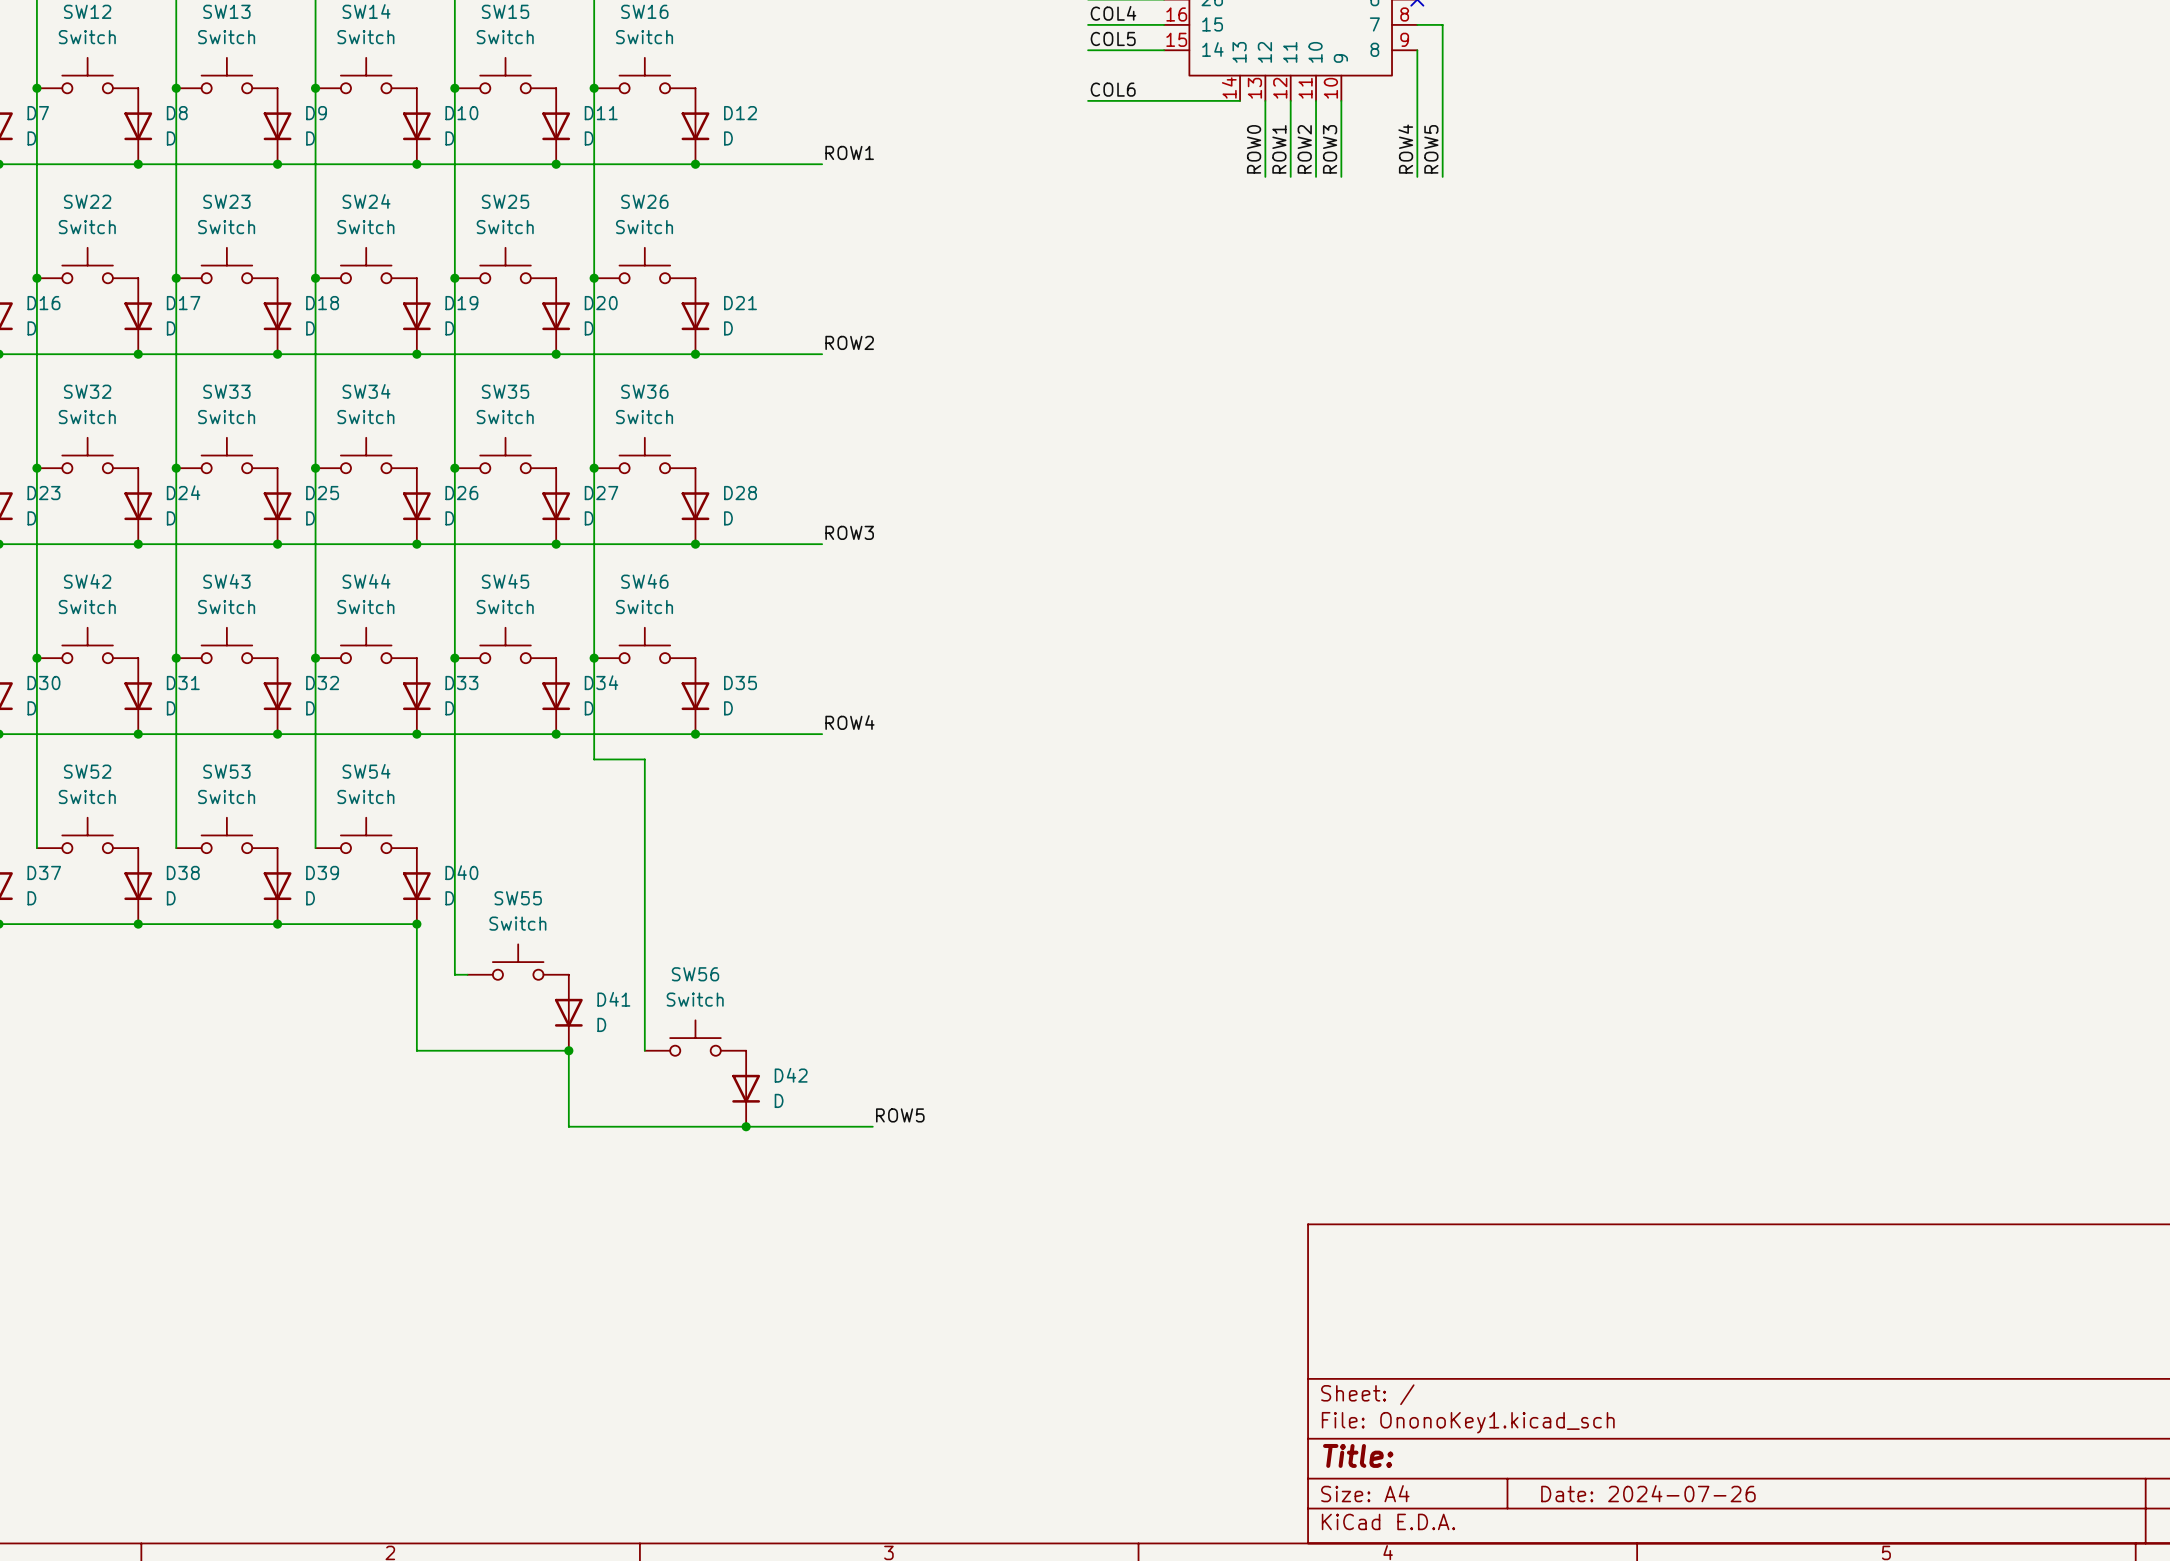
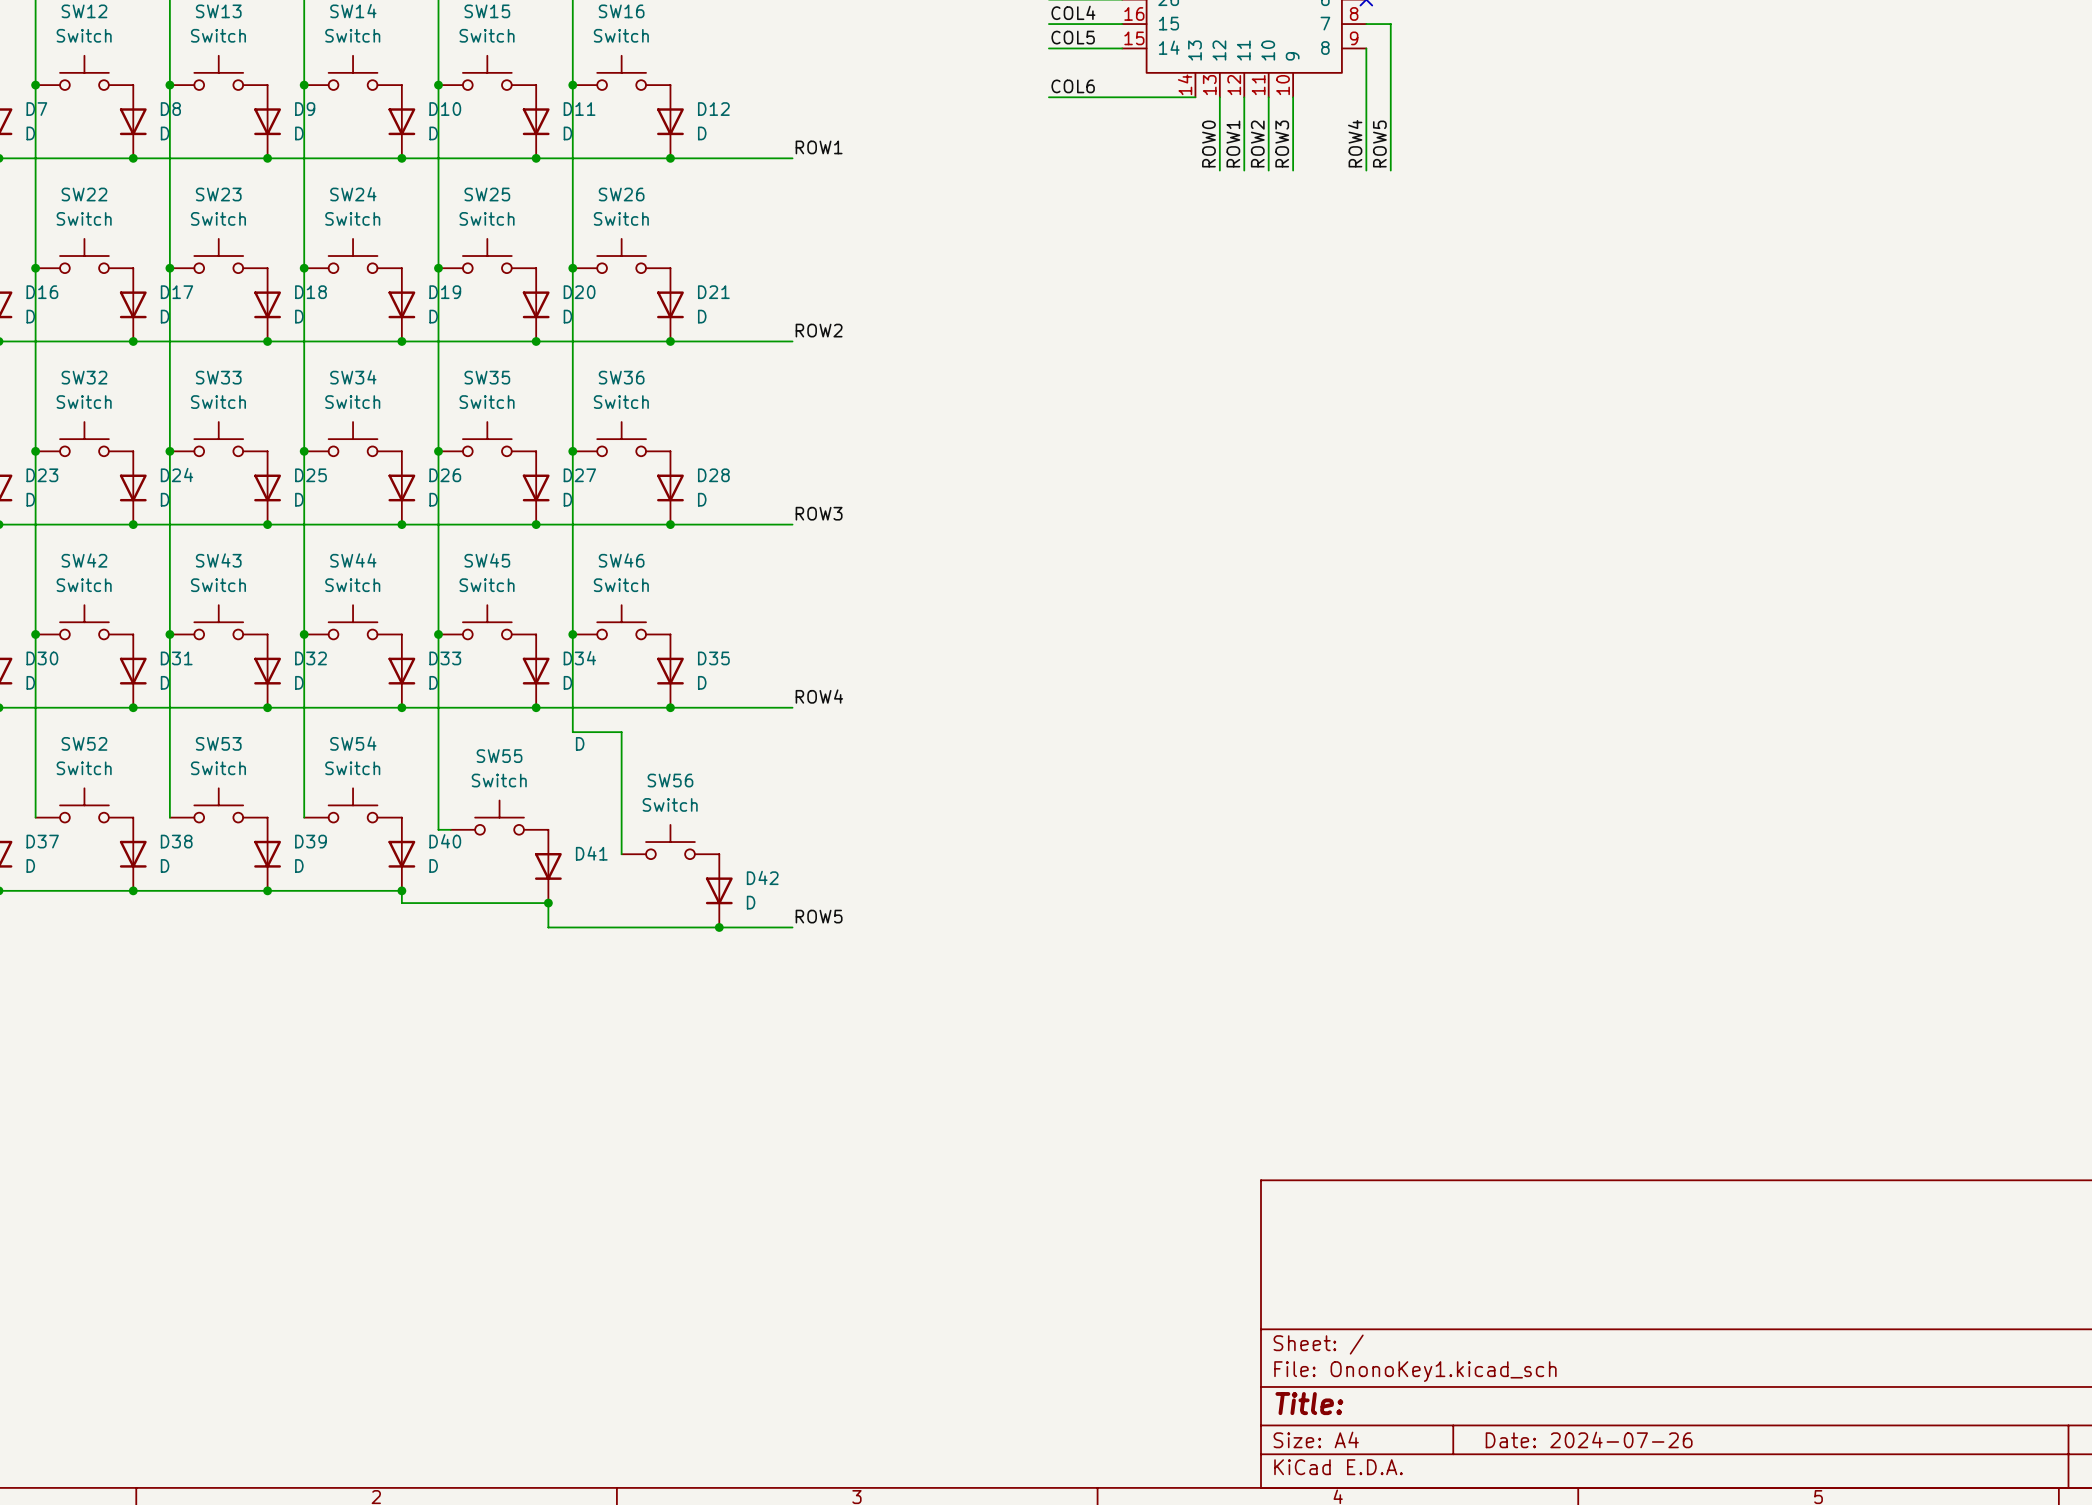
wire: (454, 860) (454, 974) (467, 974) -> (438, 829) (450, 829)
wire: (644, 886) (644, 1050) -> none
wire: (416, 936) (416, 1050) (568, 1050) (568, 1126) (872, 1126) -> (401, 903) (548, 903) (548, 927) (792, 927)
junction: none -> (548, 903)
SW55 position: (518, 962) -> (499, 817)
junction: none -> (719, 927)
D41 position: (568, 1012) -> (548, 866)
D41 value position: D (601, 1024) -> D (580, 743)
SW56 position: (695, 1038) -> (670, 842)
junction: (568, 1050) -> none
D42 position: (746, 1088) -> (719, 890)
label position: ROW5 (900, 1115) -> ROW5 (819, 916)
junction: (746, 1126) -> none

